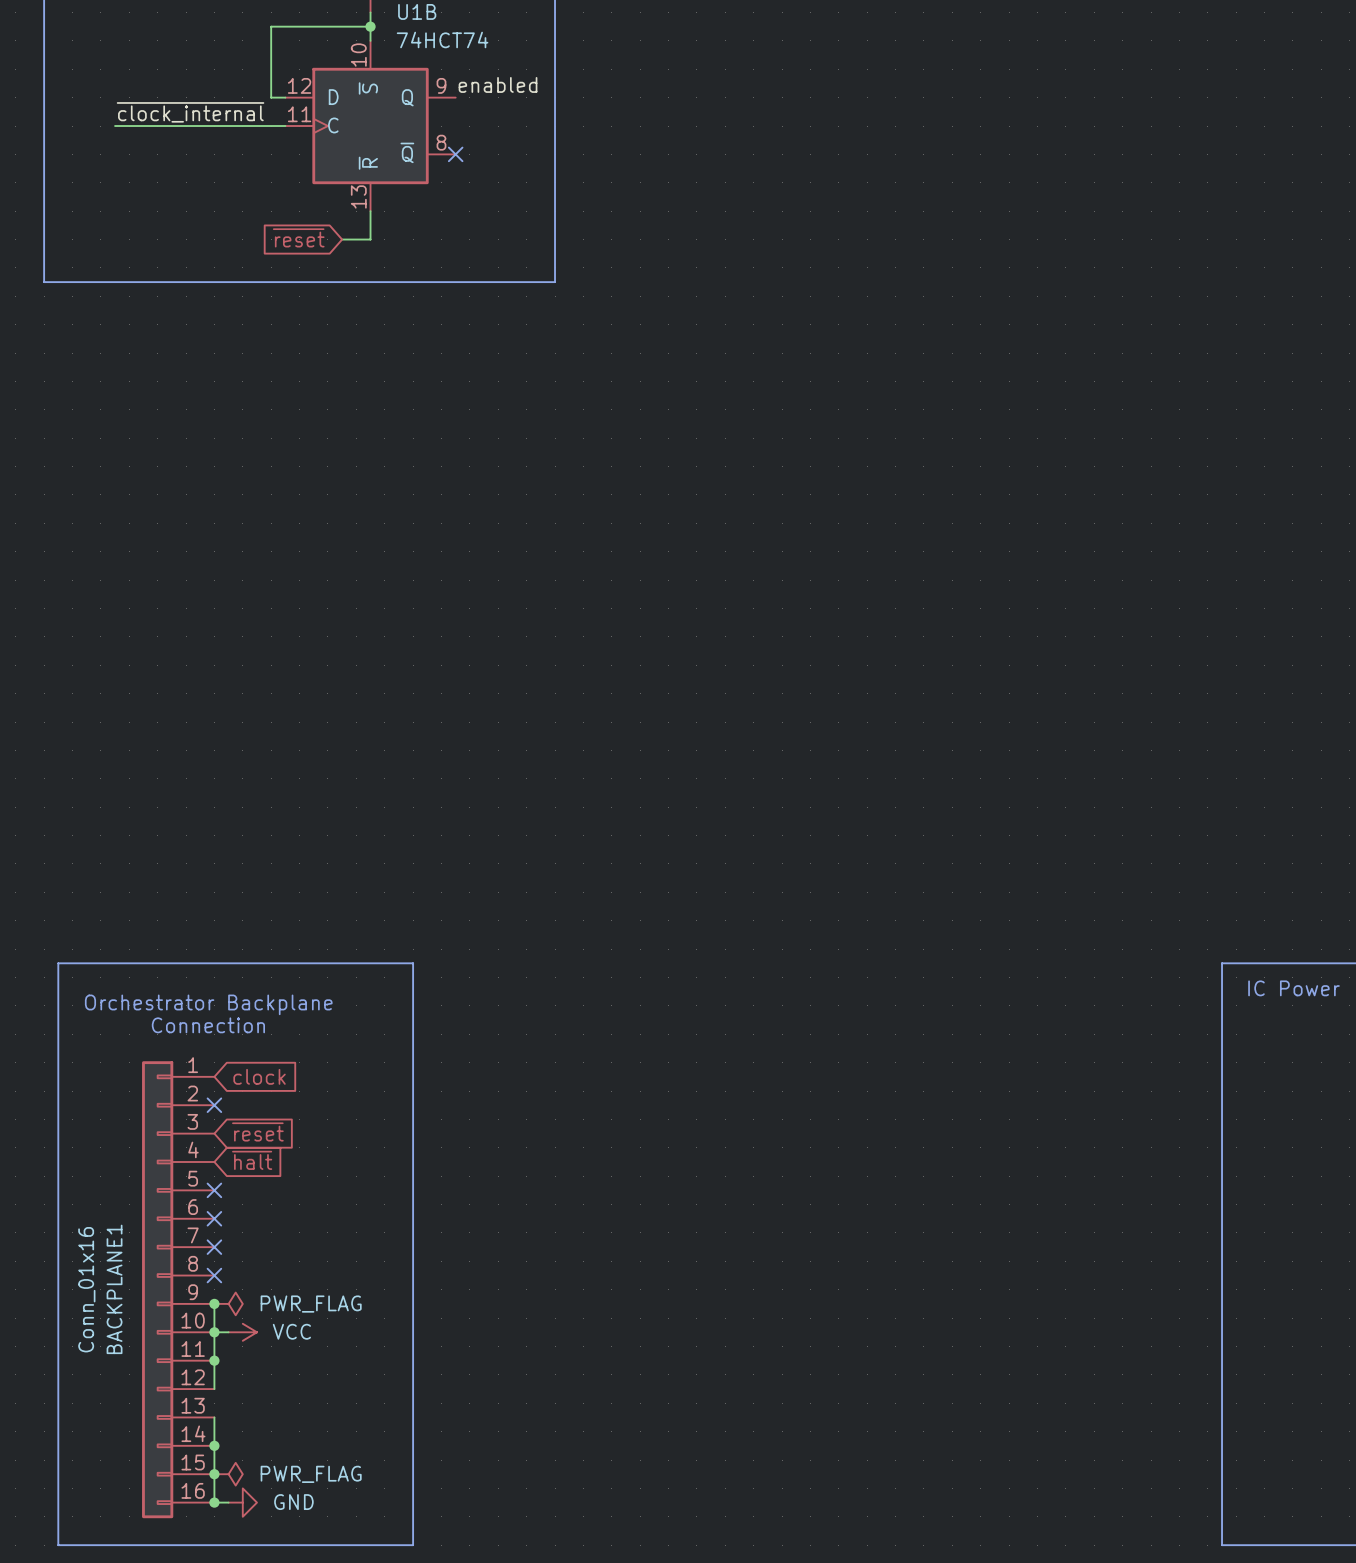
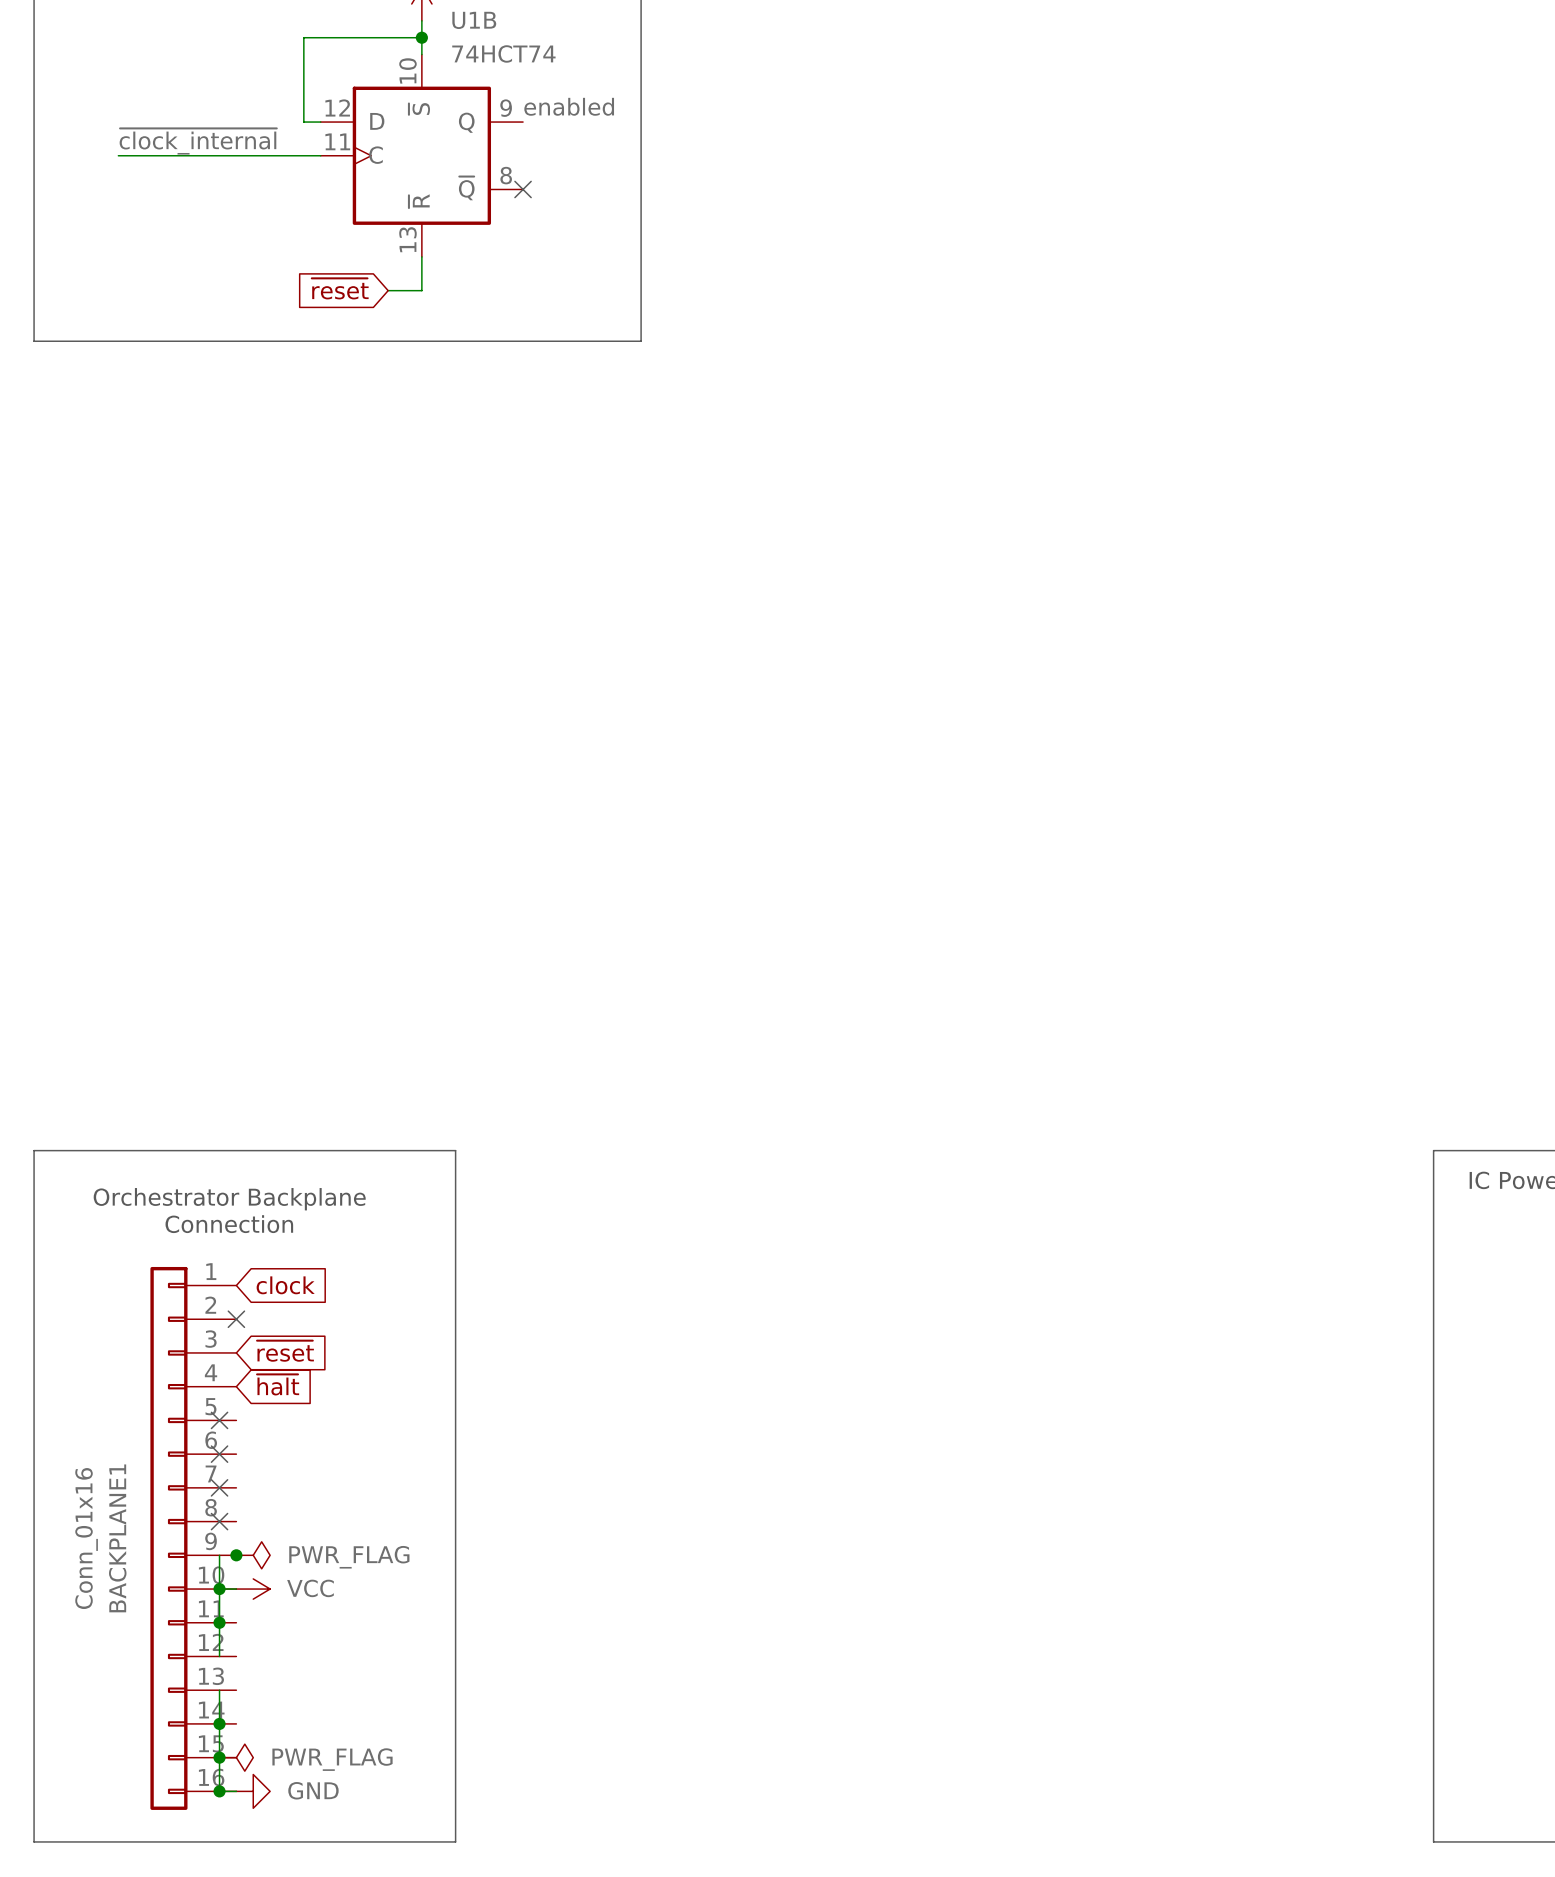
line: (58, 963) (58, 1545) -> (50, 1150) (34, 1150) (34, 1841) (50, 1841)
line: (398, 963) (413, 963) (413, 1545) (398, 1545) -> (455, 1150) (455, 1841)
no-connect mark position: (214, 1190) -> (219, 1420)
no-connect mark position: (214, 1218) -> (219, 1454)
no-connect mark position: (214, 1247) -> (219, 1487)
no-connect mark position: (214, 1275) -> (219, 1521)
wire: (214, 1303) (214, 1389) -> (219, 1555) (219, 1656)
junction position: (214, 1332) -> (219, 1589)
power symbol position: VCC (242, 1332) -> VCC (253, 1589)
junction position: (214, 1360) -> (219, 1622)
wire: (214, 1417) (214, 1502) (228, 1502) -> (219, 1690) (219, 1791) (236, 1791)
junction position: (214, 1445) -> (219, 1723)
junction position: (214, 1474) -> (219, 1757)
power symbol position: PWR_FLAG (228, 1474) -> PWR_FLAG (236, 1757)
junction position: (214, 1502) -> (219, 1791)
power symbol position: GND (242, 1502) -> GND (253, 1791)

